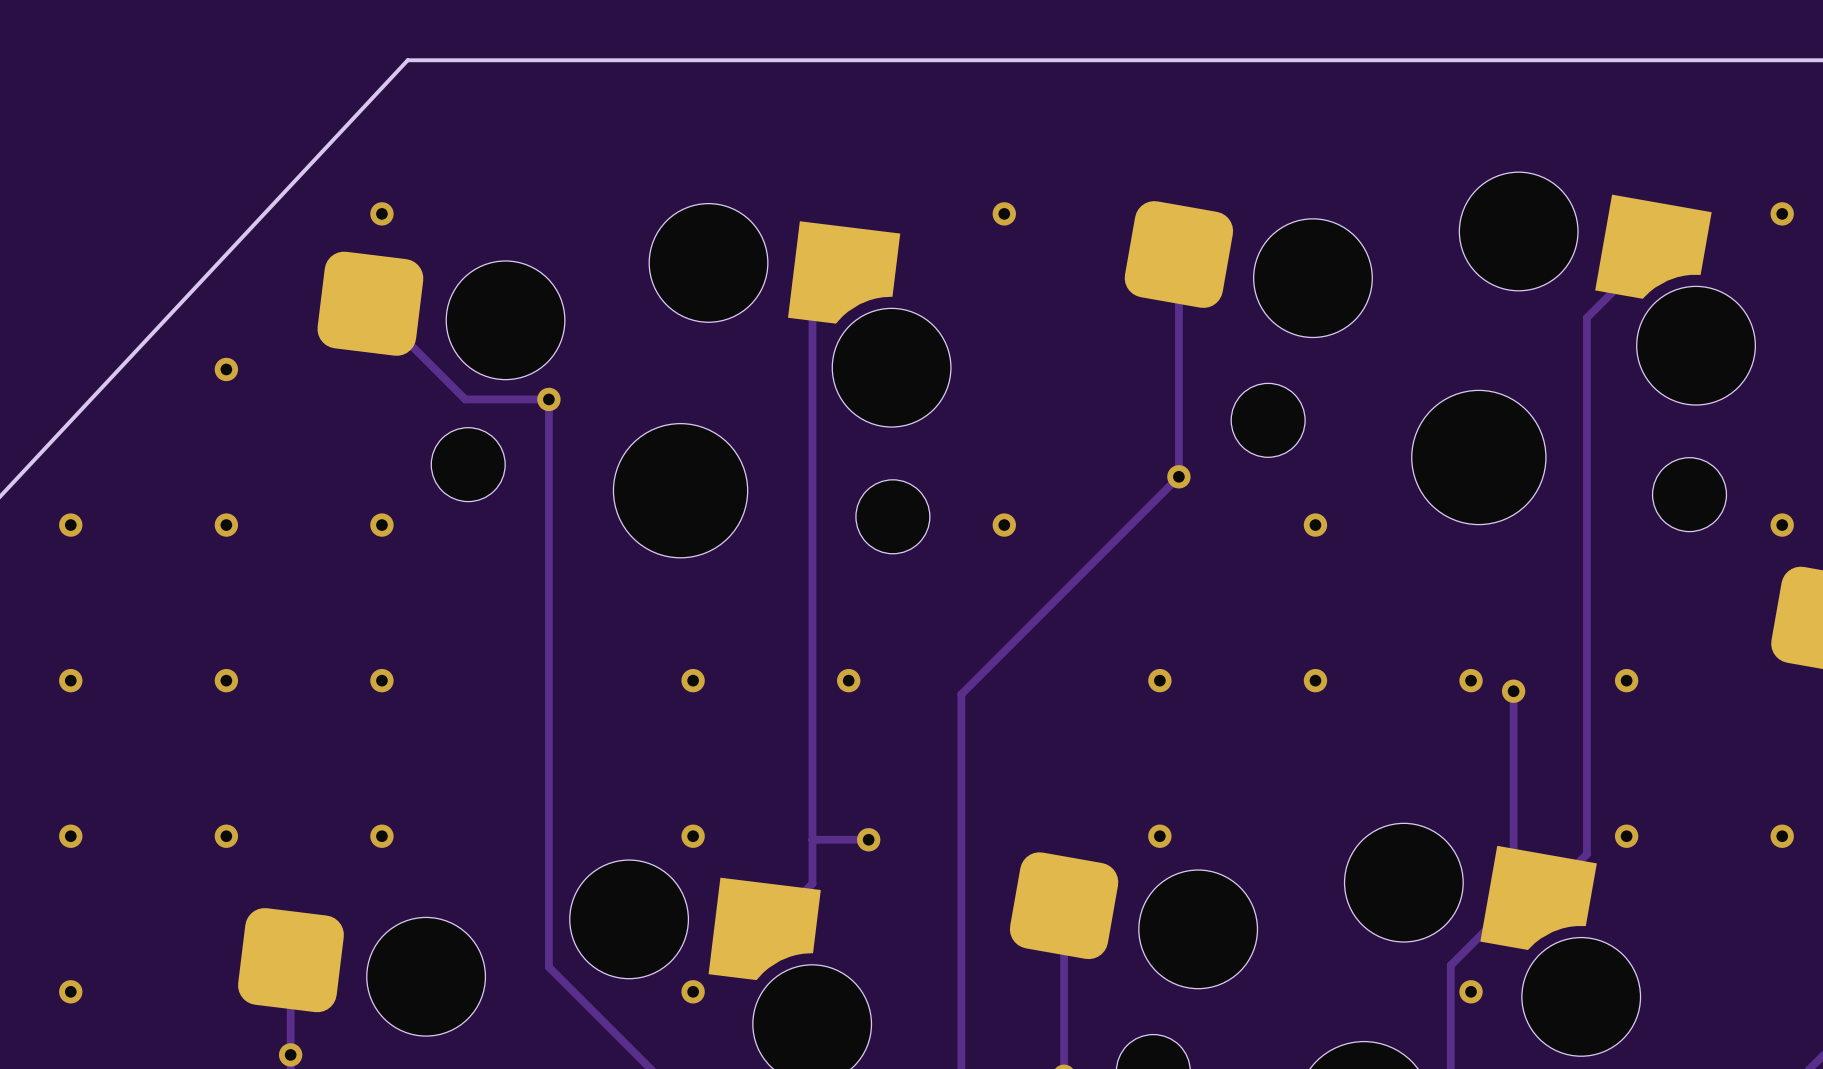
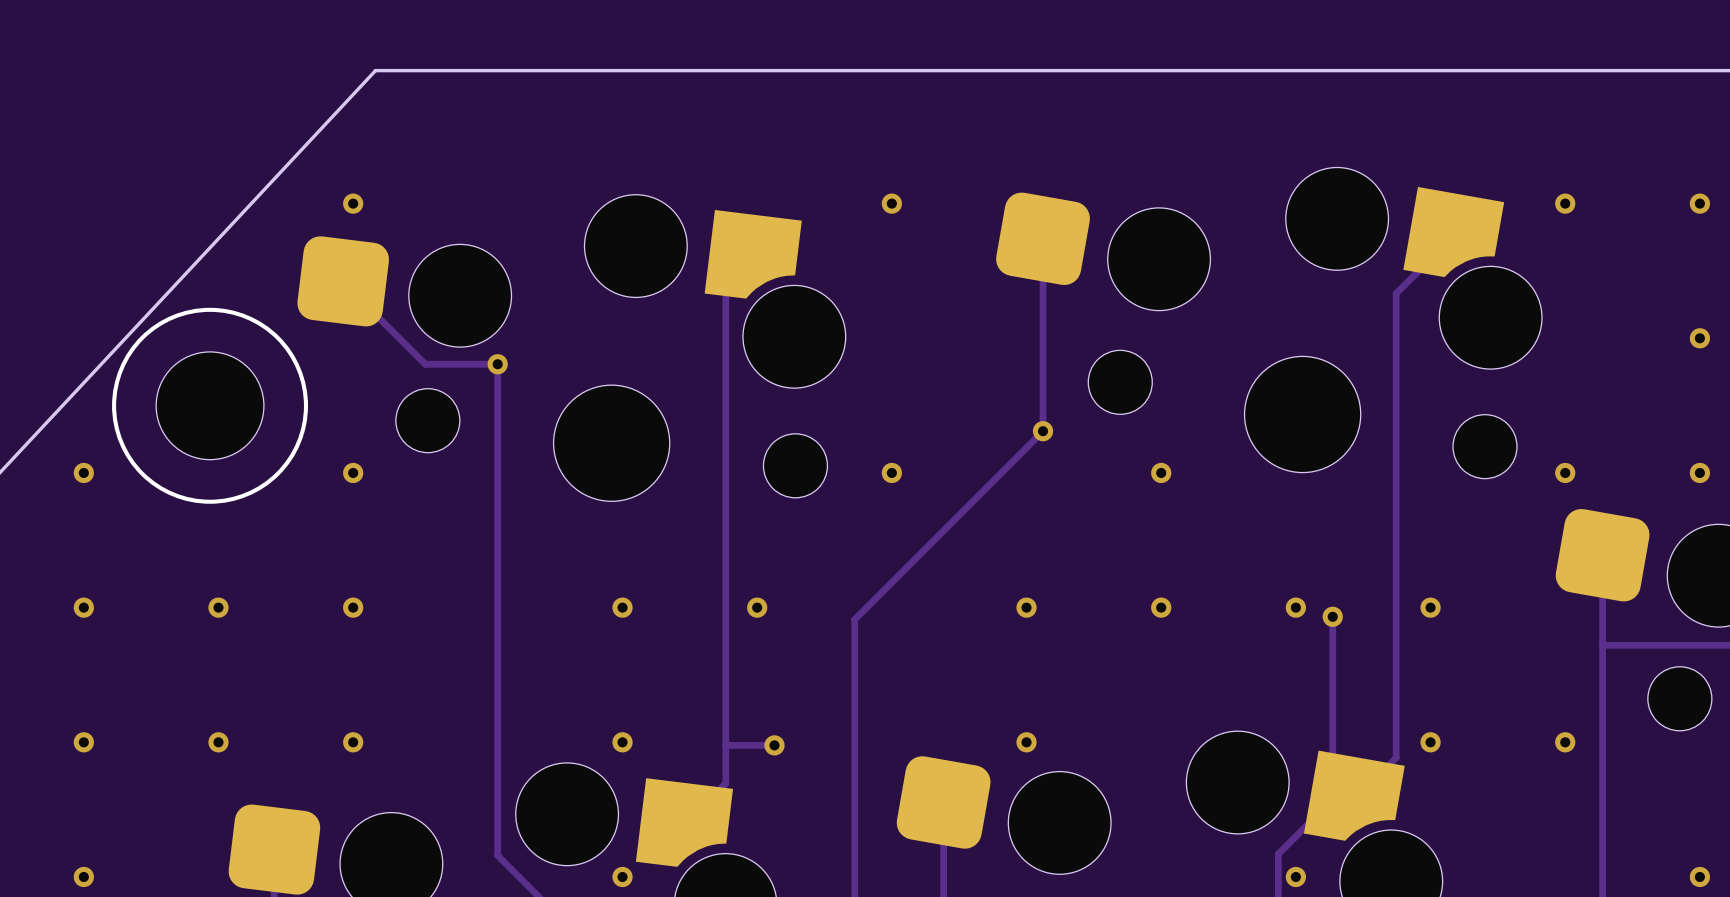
via: (226, 369) -> none
part: none -> (210, 405)
via: (226, 525) -> none

